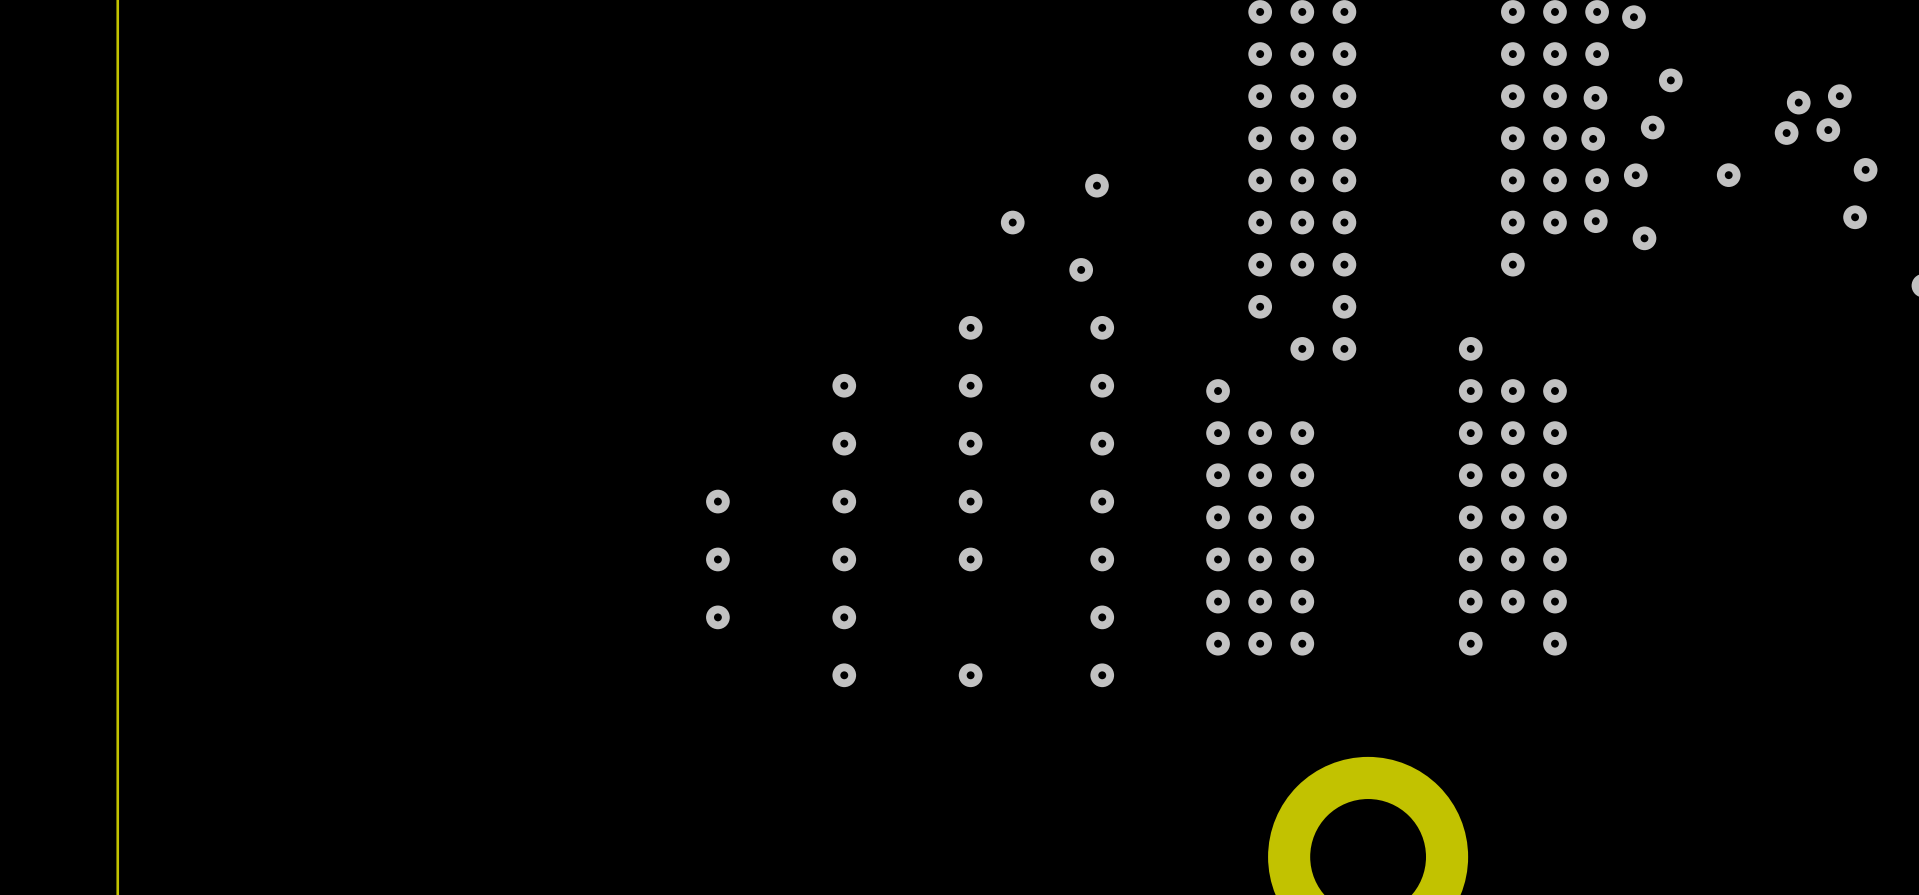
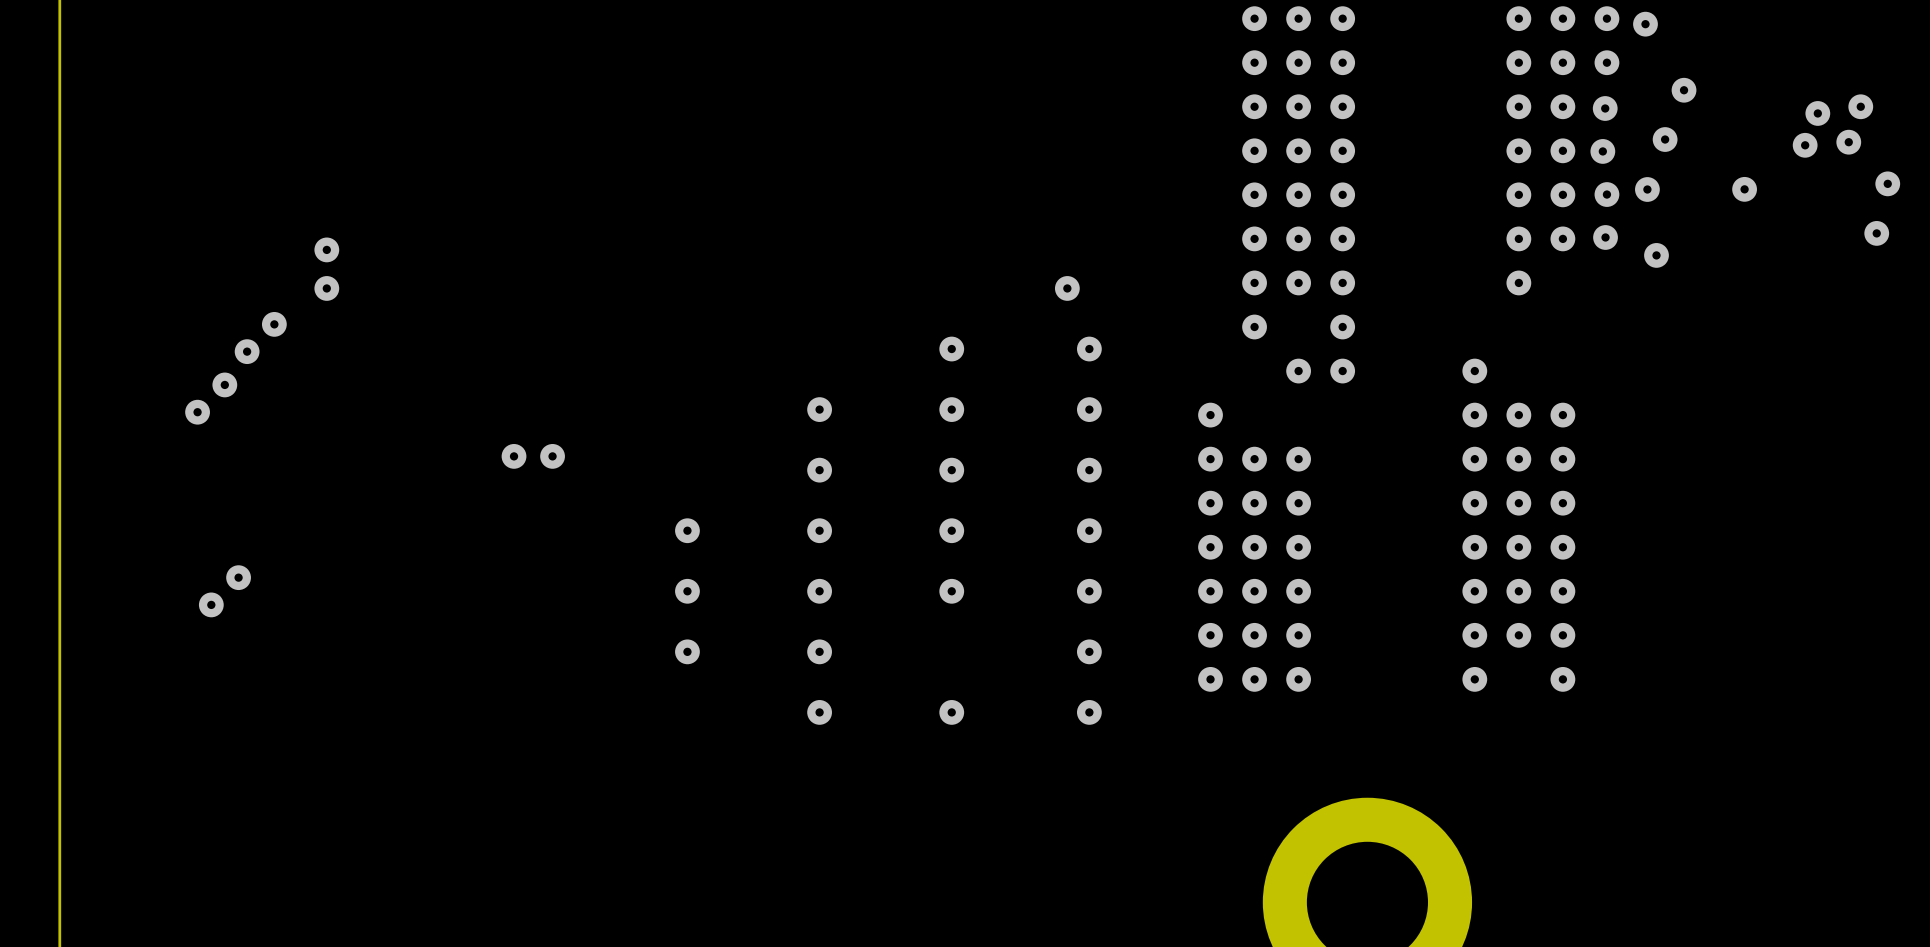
via: (1096, 185) -> none
via: (1012, 222) -> none
via: none -> (326, 249)
via: none -> (326, 288)
via: none -> (274, 324)
via: none -> (247, 351)
via: none -> (224, 384)
via: none -> (197, 412)
via: none -> (514, 456)
via: none -> (552, 456)
via: none -> (238, 577)
via: none -> (211, 604)

